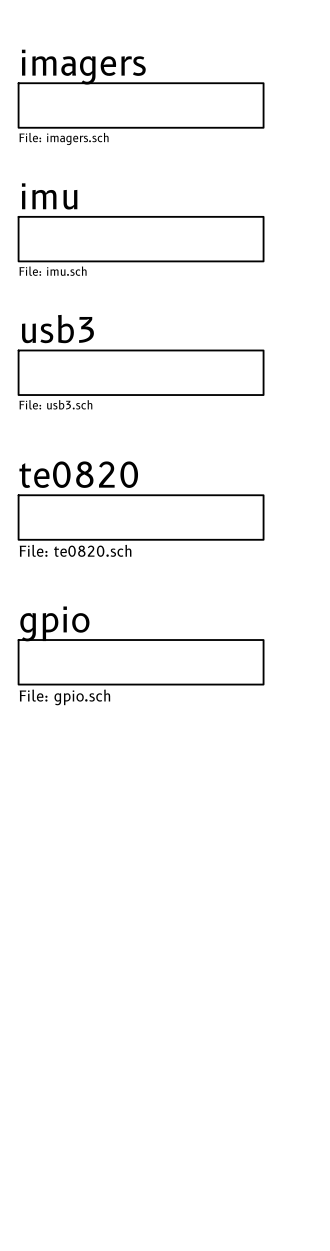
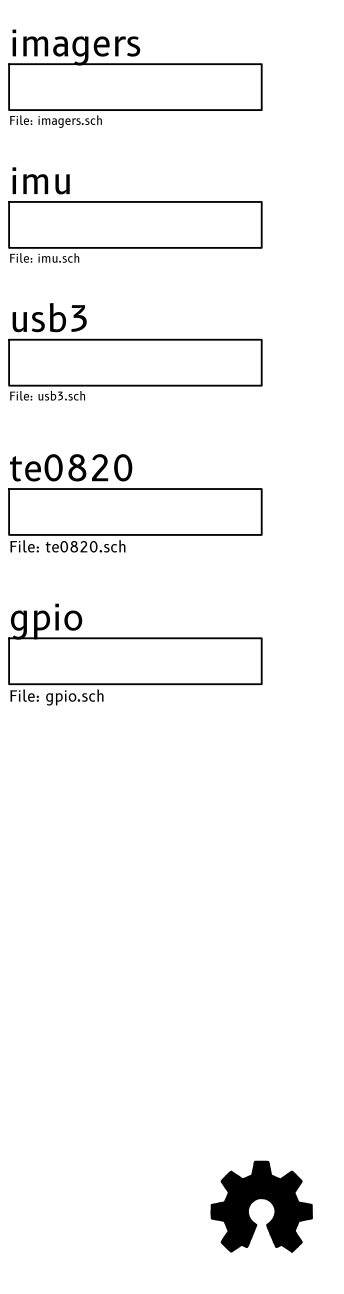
part: none -> (261, 1206)

